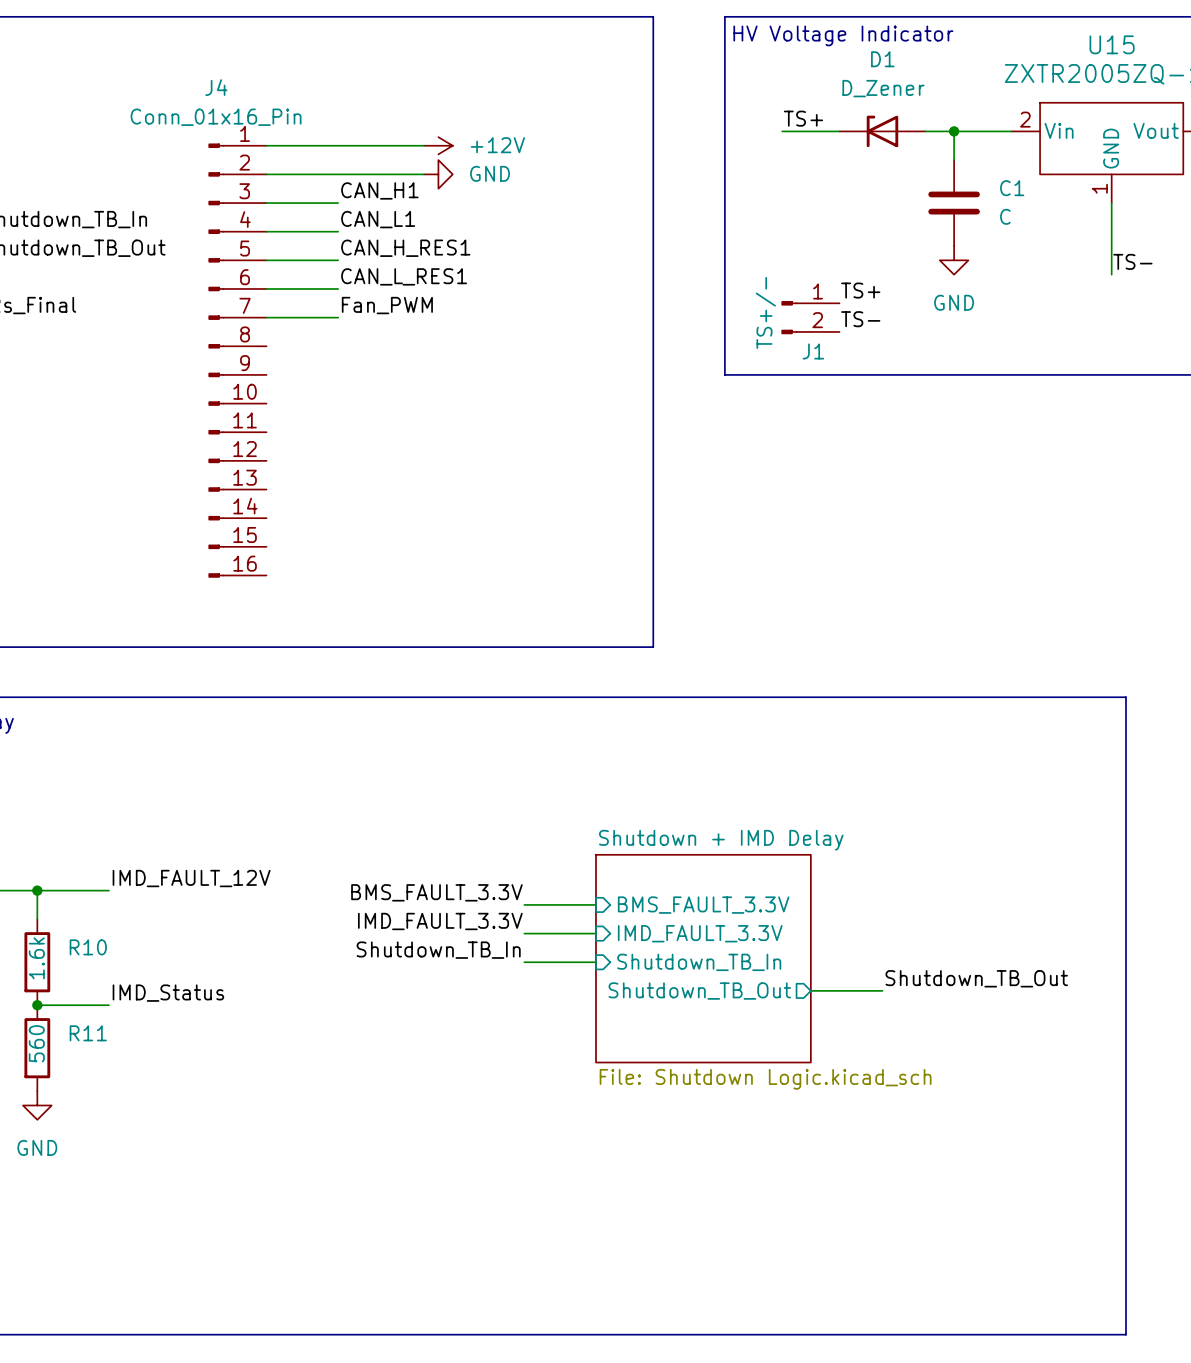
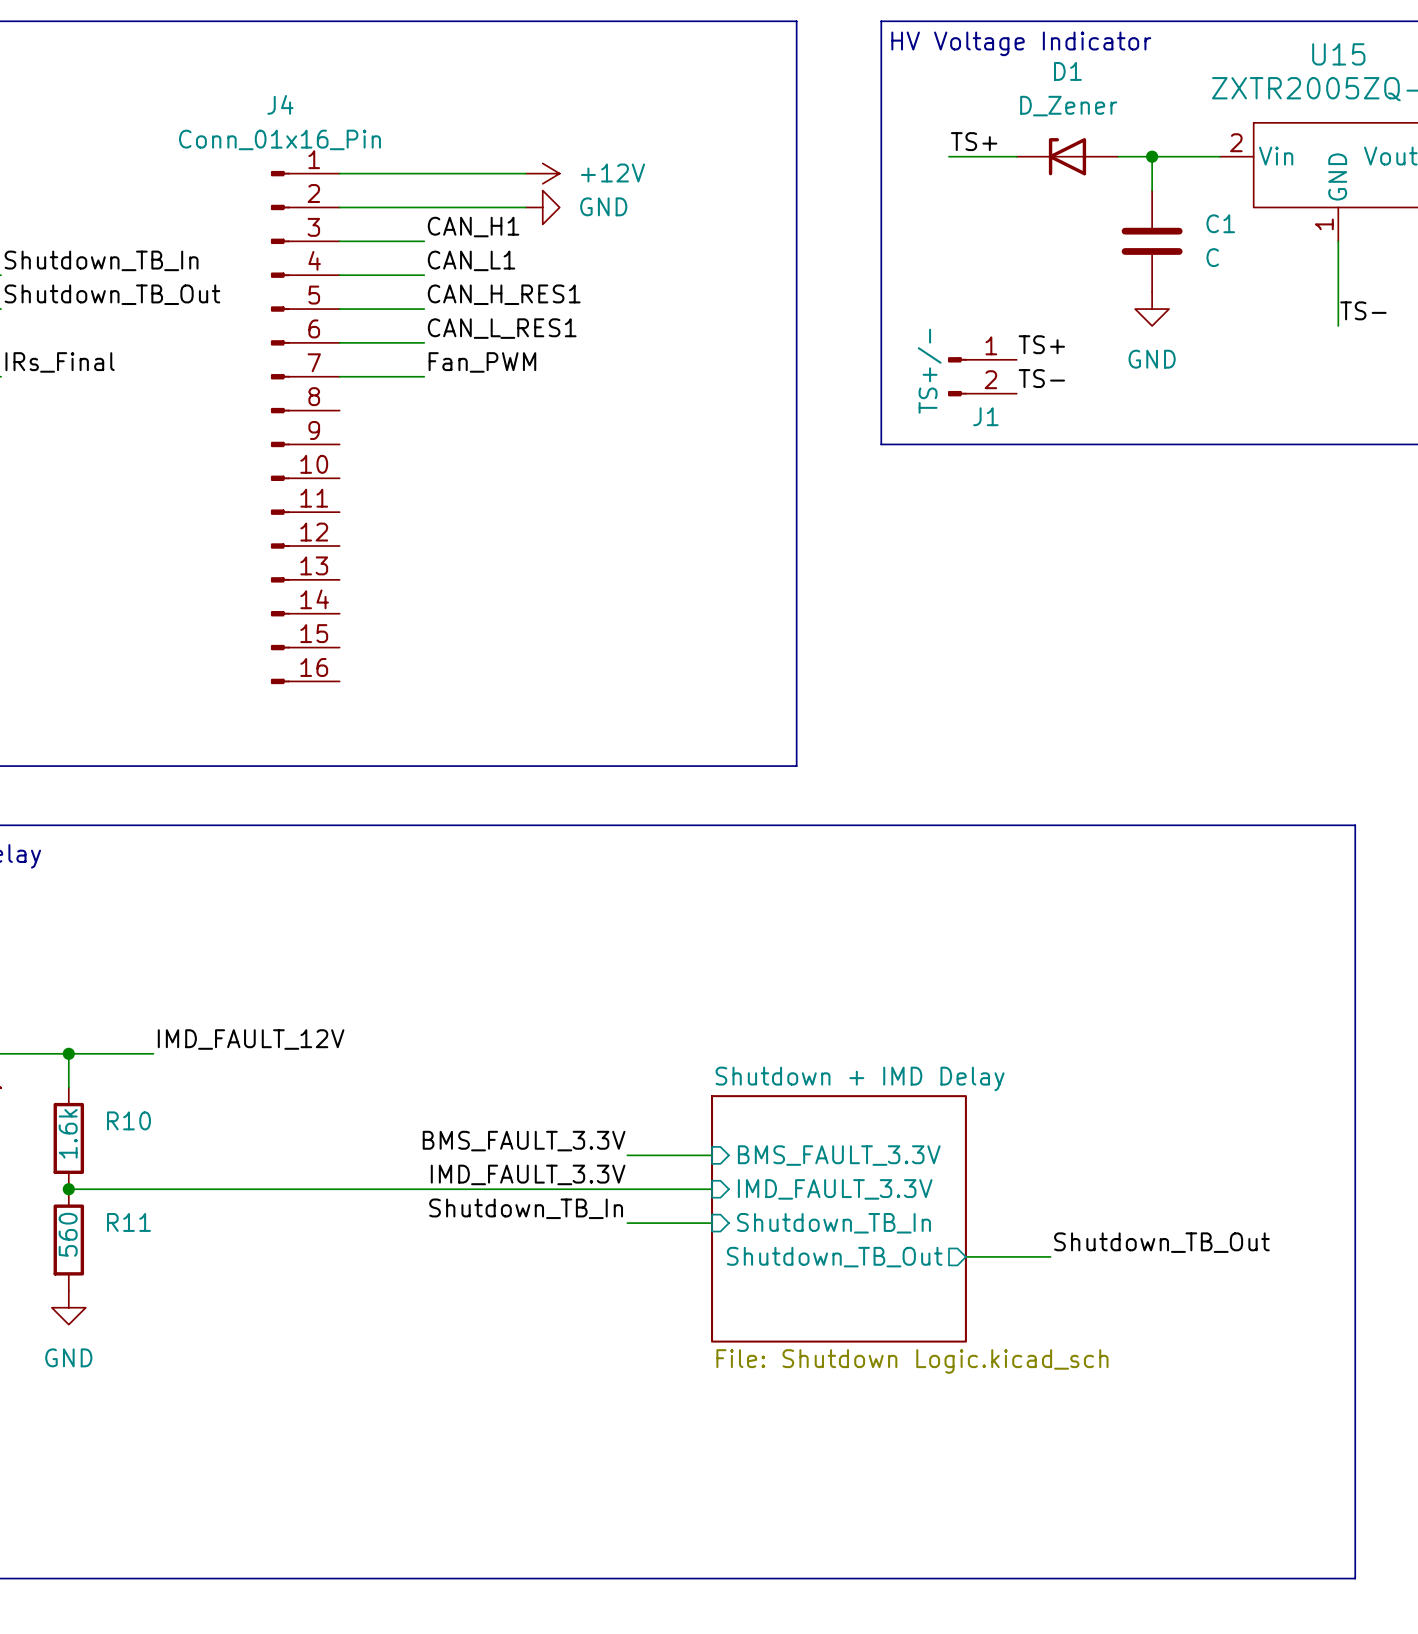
label position: BMS_FAULT_3.3V (436, 892) -> BMS_FAULT_3.3V (524, 1141)
wire: (524, 904) (595, 904) -> (627, 1155) (712, 1155)
sheet pin position: BMS_FAULT_3.3V (703, 905) -> BMS_FAULT_3.3V (839, 1155)
label position: IMD_FAULT_3.3V (440, 921) -> IMD_FAULT_3.3V (528, 1174)
wire: (524, 933) (595, 933) -> none
sheet pin position: IMD_FAULT_3.3V (700, 933) -> IMD_FAULT_3.3V (835, 1189)
label position: Shutdown_TB_In (438, 950) -> Shutdown_TB_In (526, 1208)
sheet Shutdown + IMD Delay position: (703, 958) -> (838, 1218)
wire: (524, 962) (595, 962) -> (627, 1223) (712, 1223)
sheet pin position: Shutdown_TB_In (699, 962) -> Shutdown_TB_In (834, 1223)
label position: Shutdown_TB_Out (976, 978) -> Shutdown_TB_Out (1161, 1242)
wire: (810, 990) (882, 990) -> (965, 1256) (1050, 1256)
sheet pin position: Shutdown_TB_Out (699, 991) -> Shutdown_TB_Out (834, 1257)
label: IMD_Status (168, 993) -> none
wire: none -> (153, 1189) (712, 1189)

